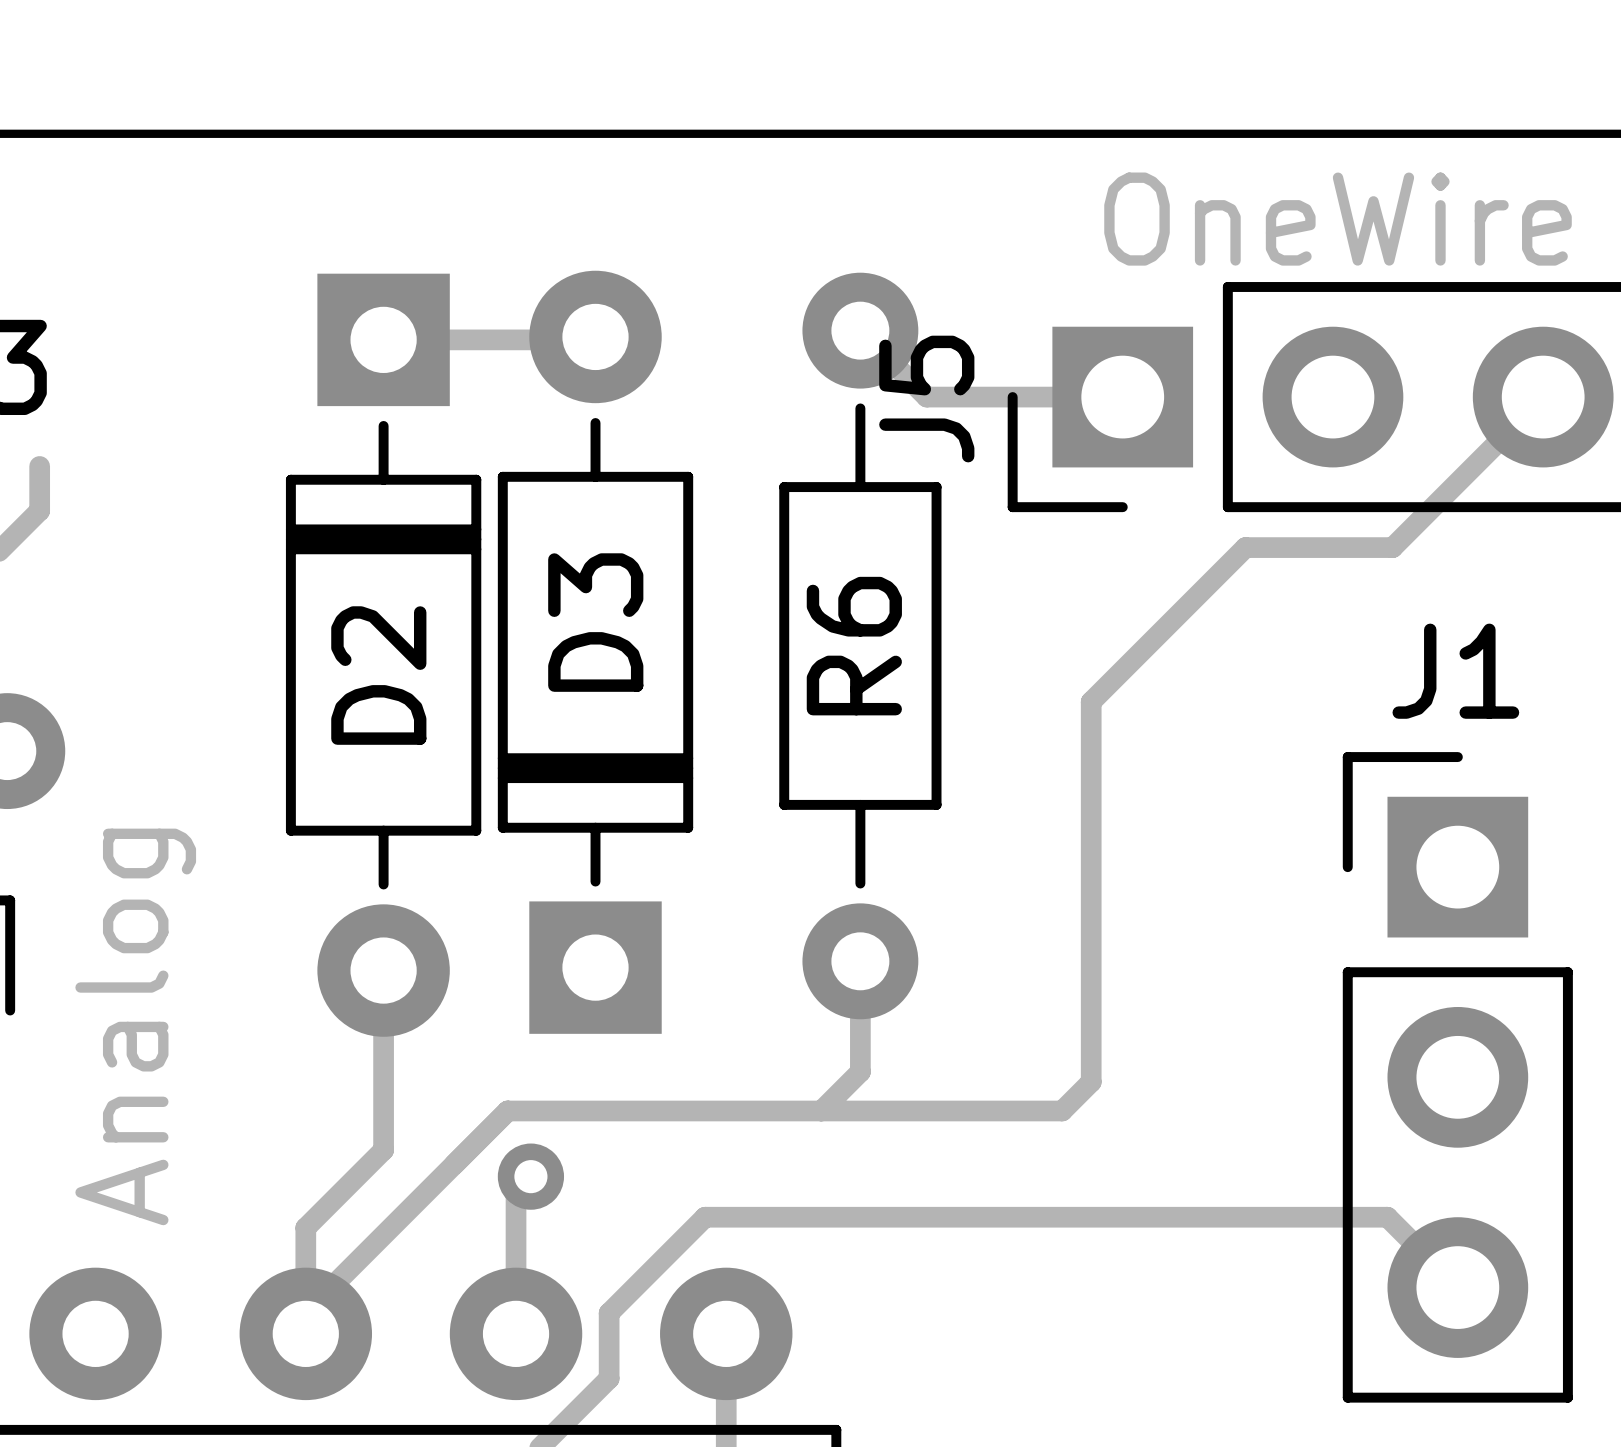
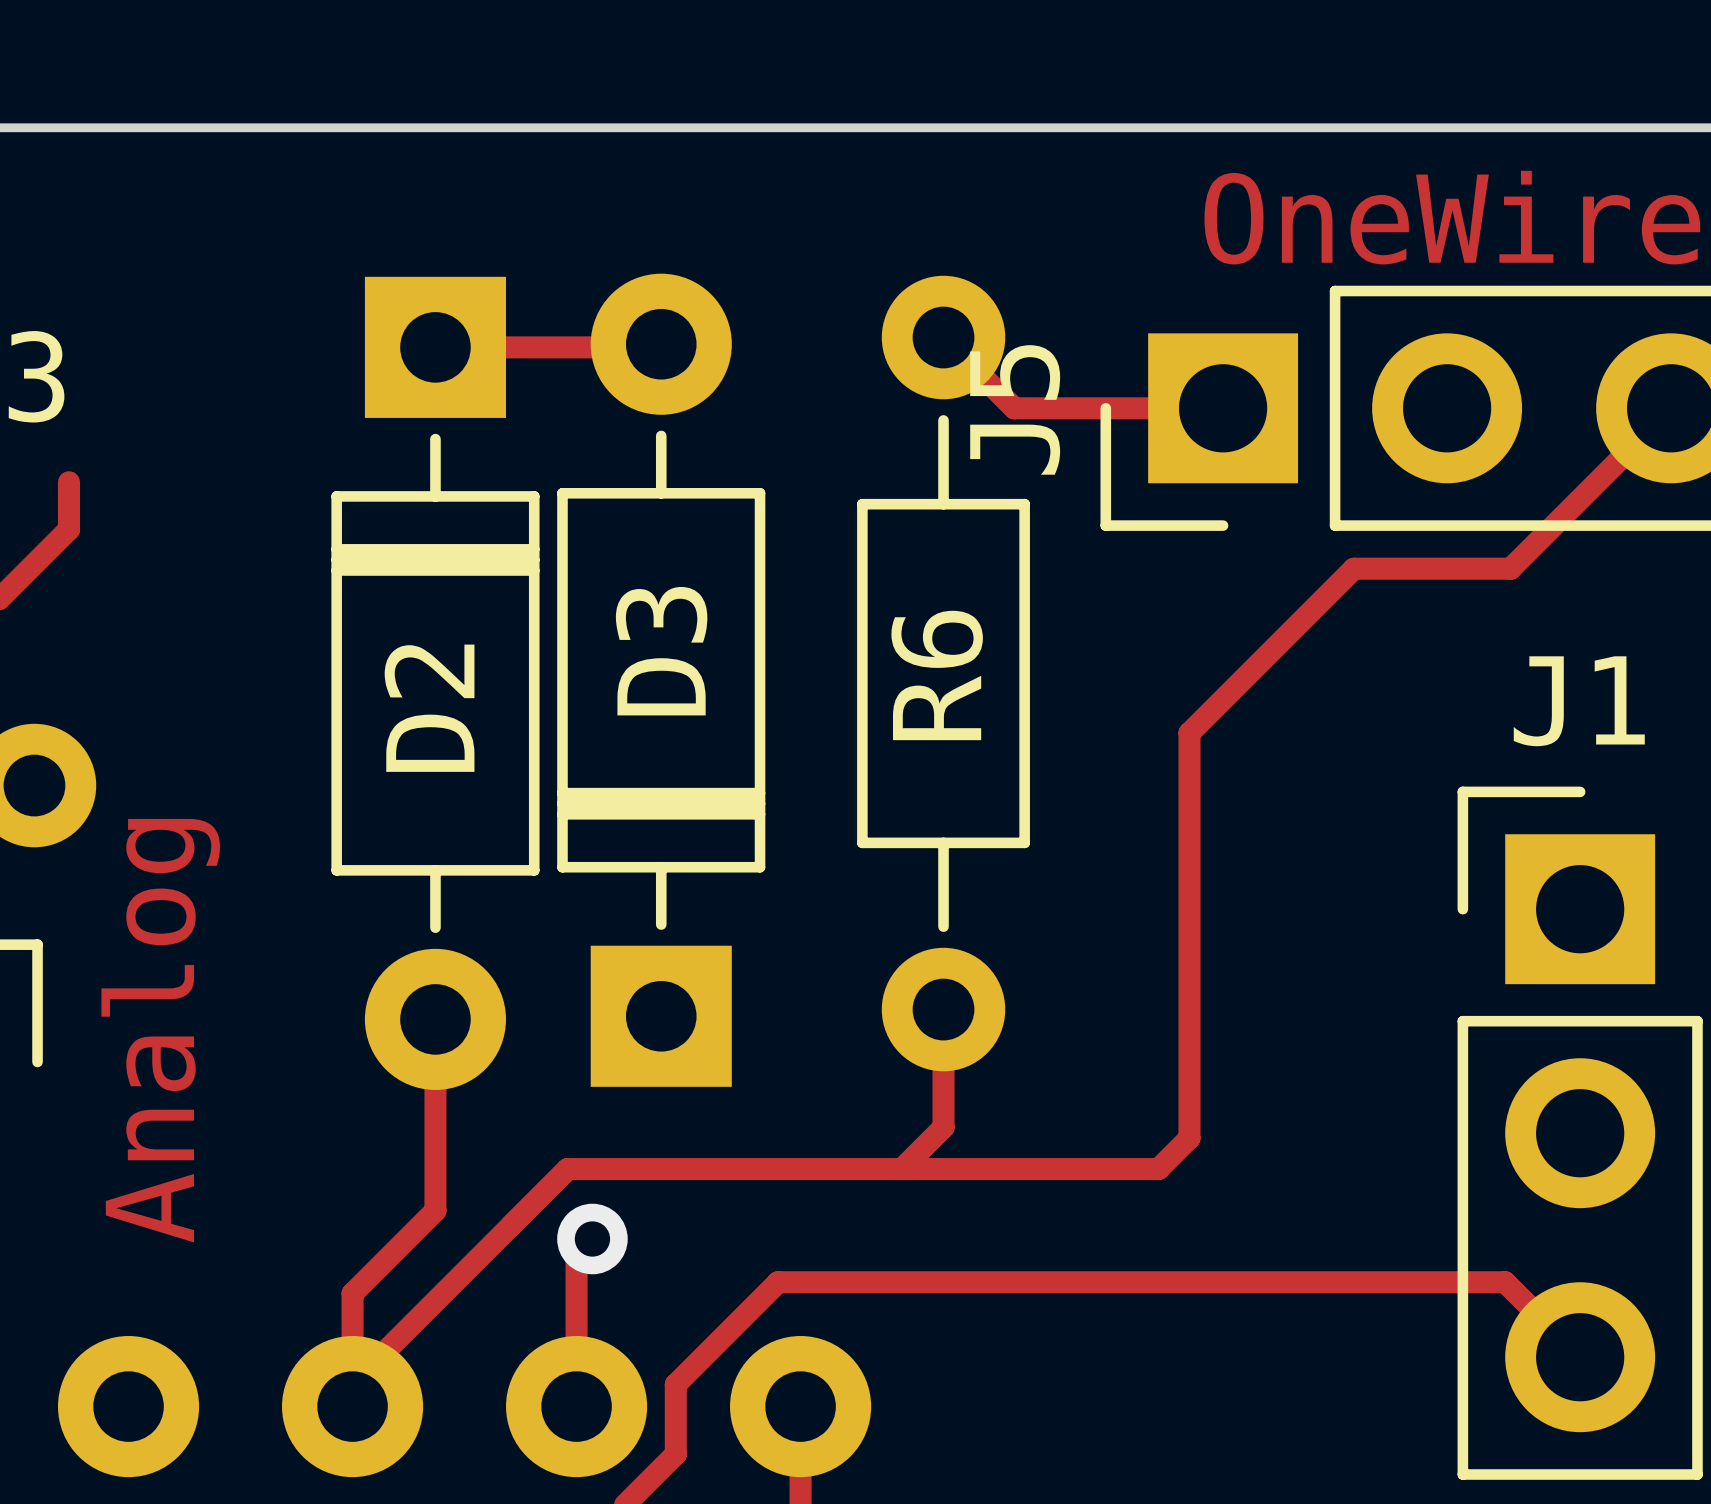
text position: Analog (135, 1026) -> Analog (160, 1030)

